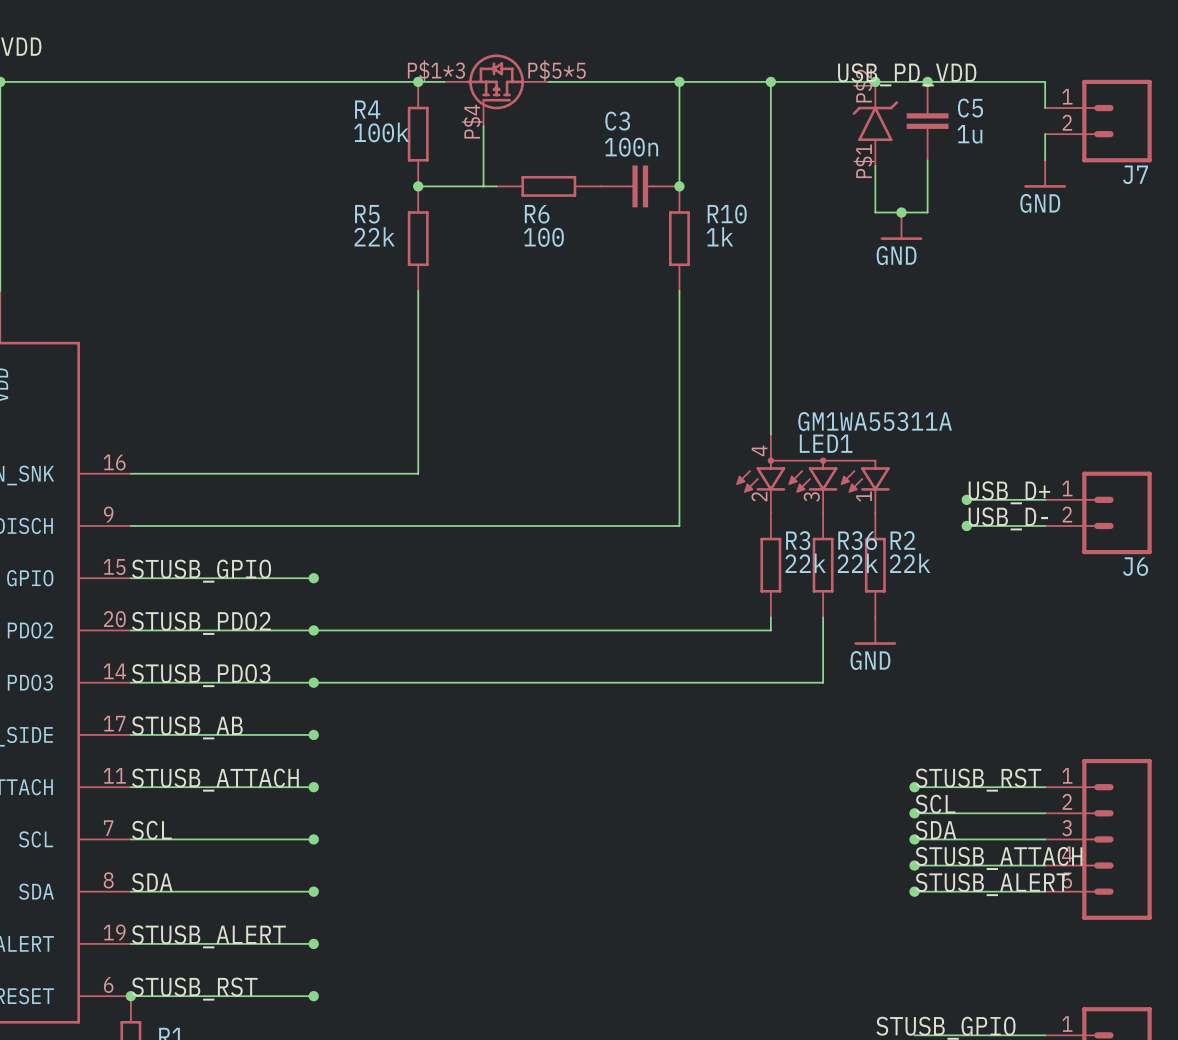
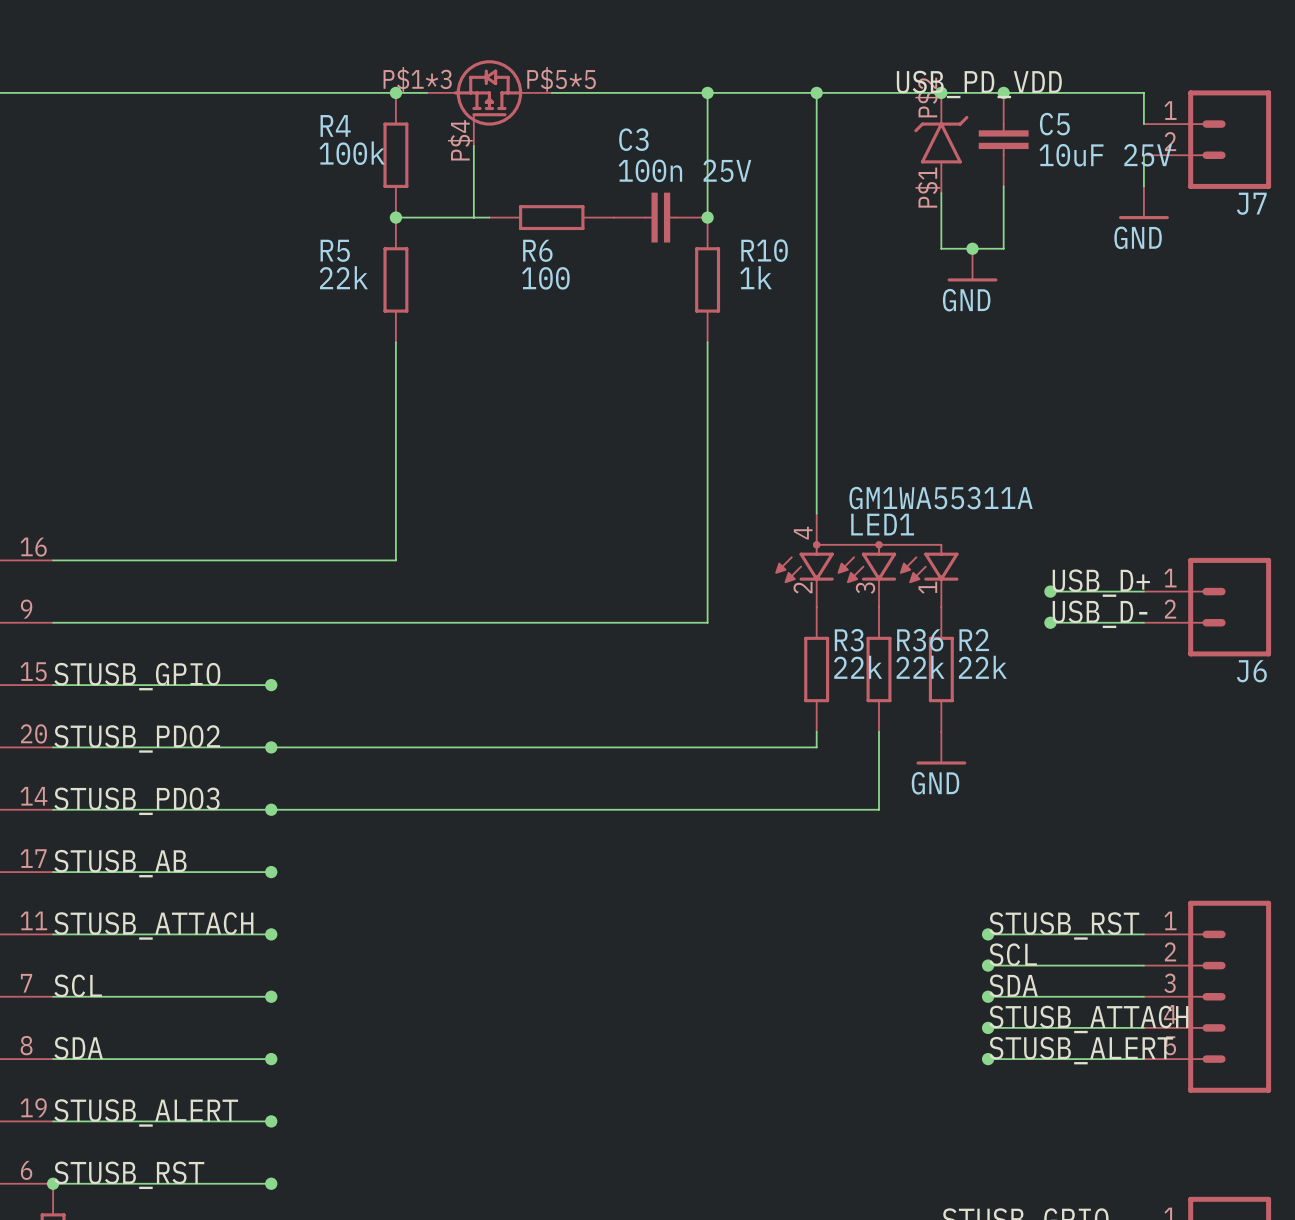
C5 value: 1u (969, 134) -> 10uF 25V (1105, 155)
C3 value: 100n (631, 147) -> 100n 25V (684, 170)

